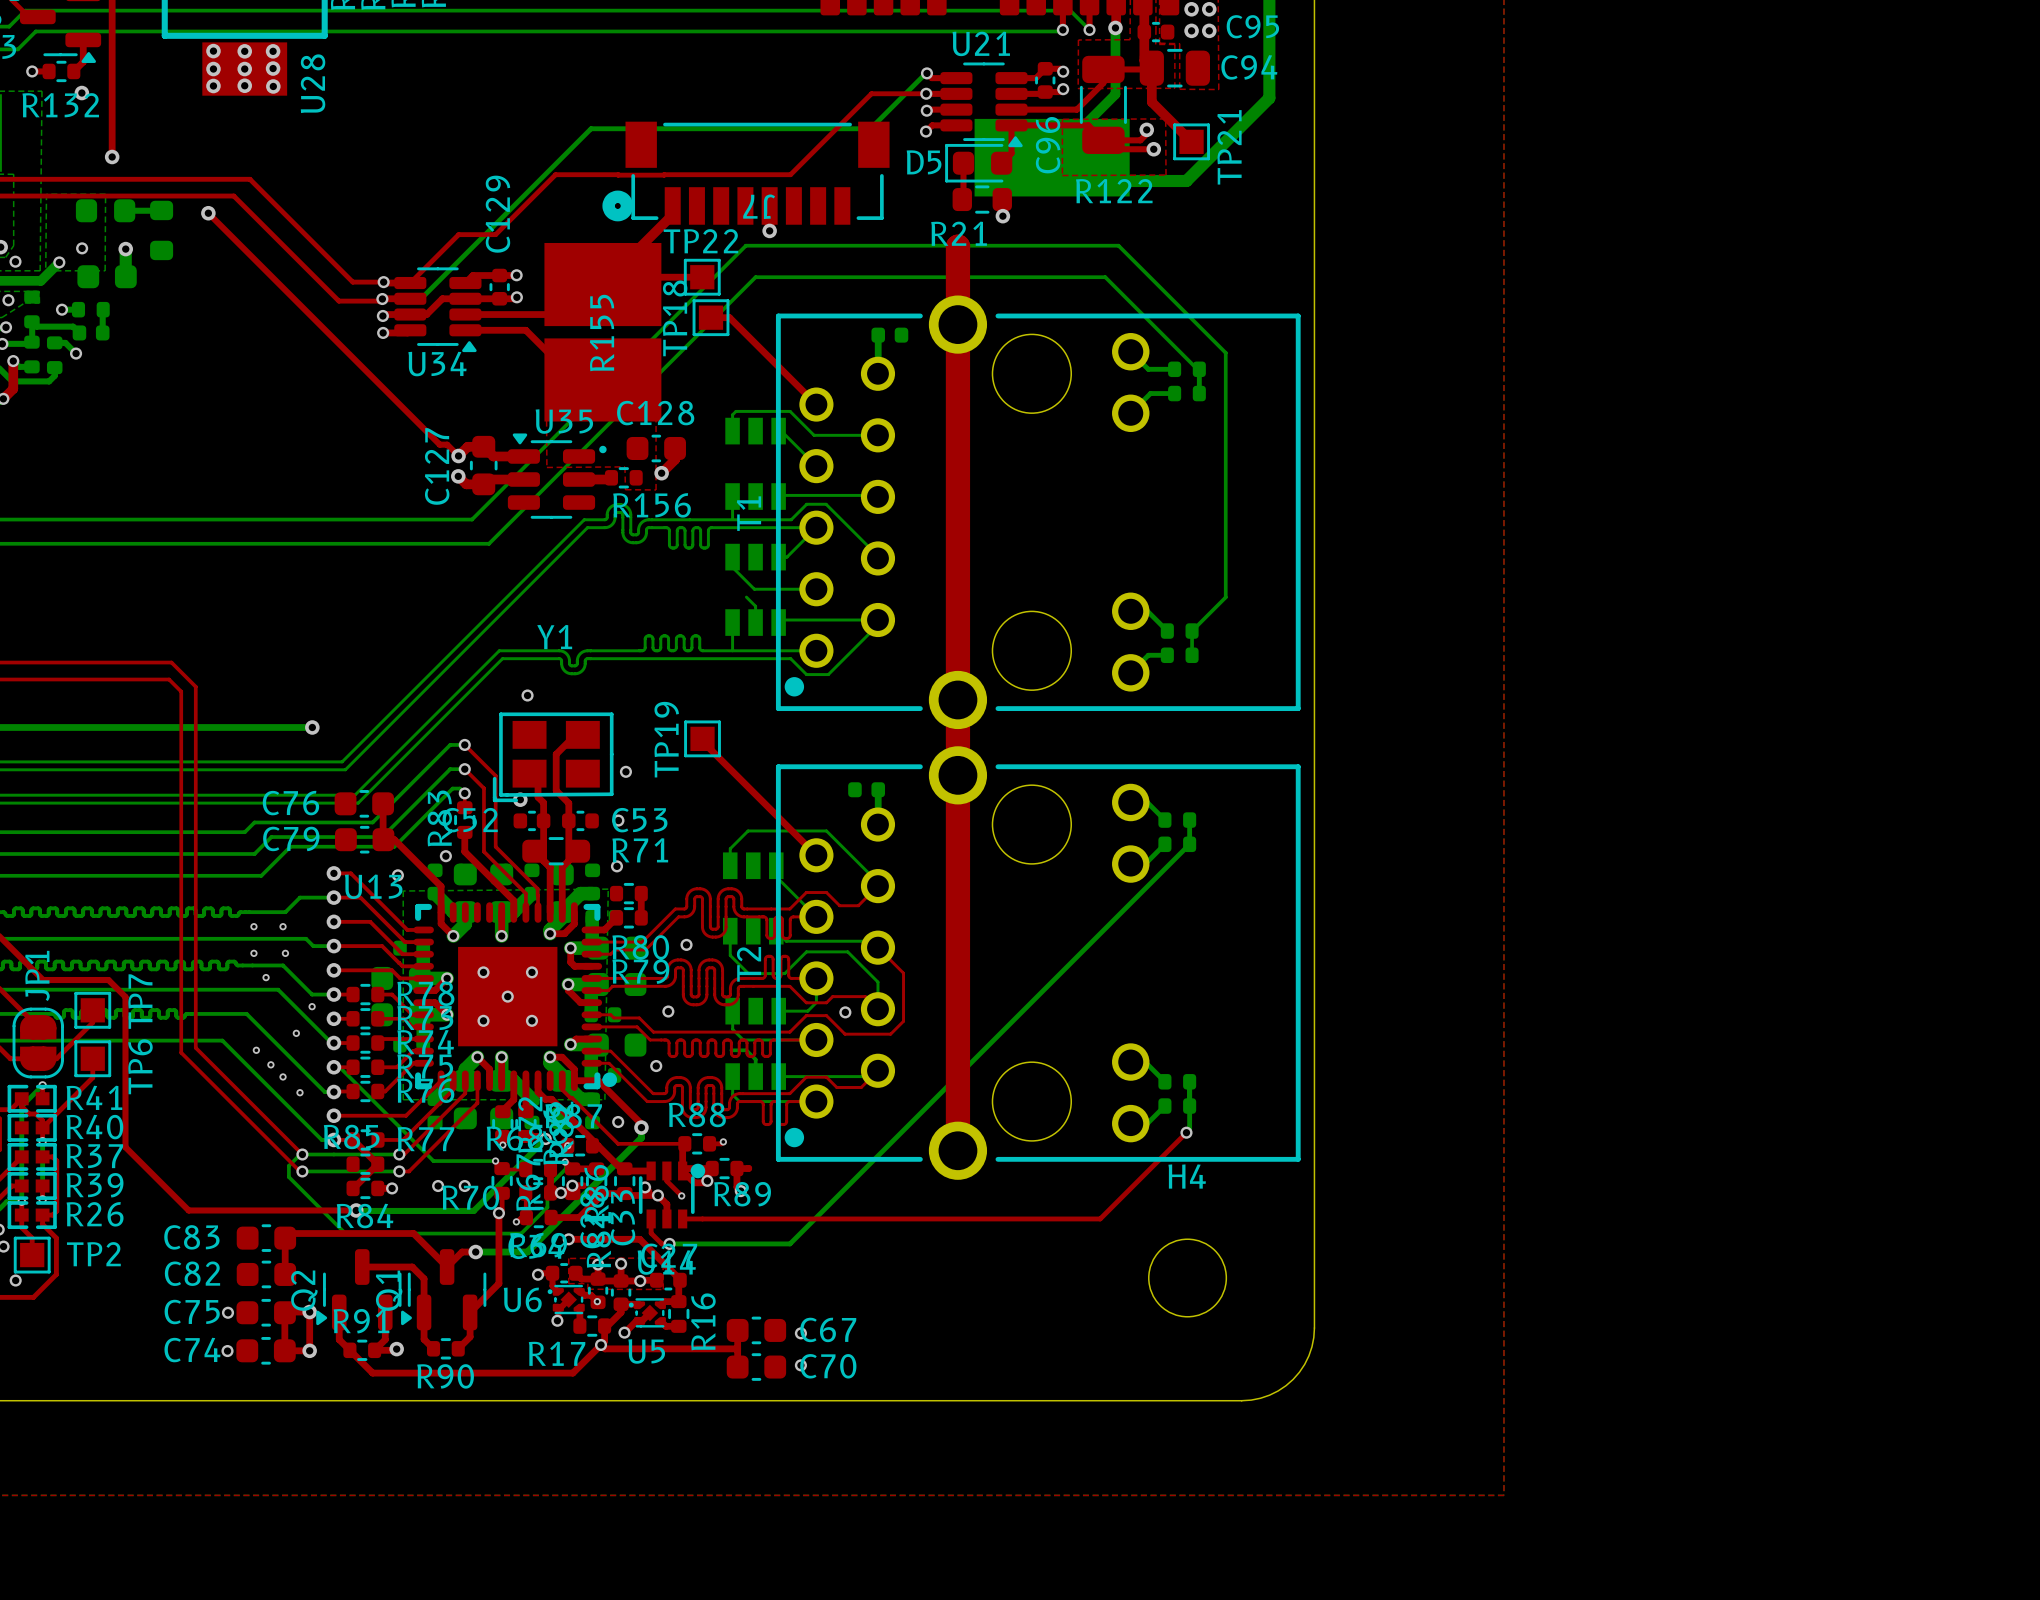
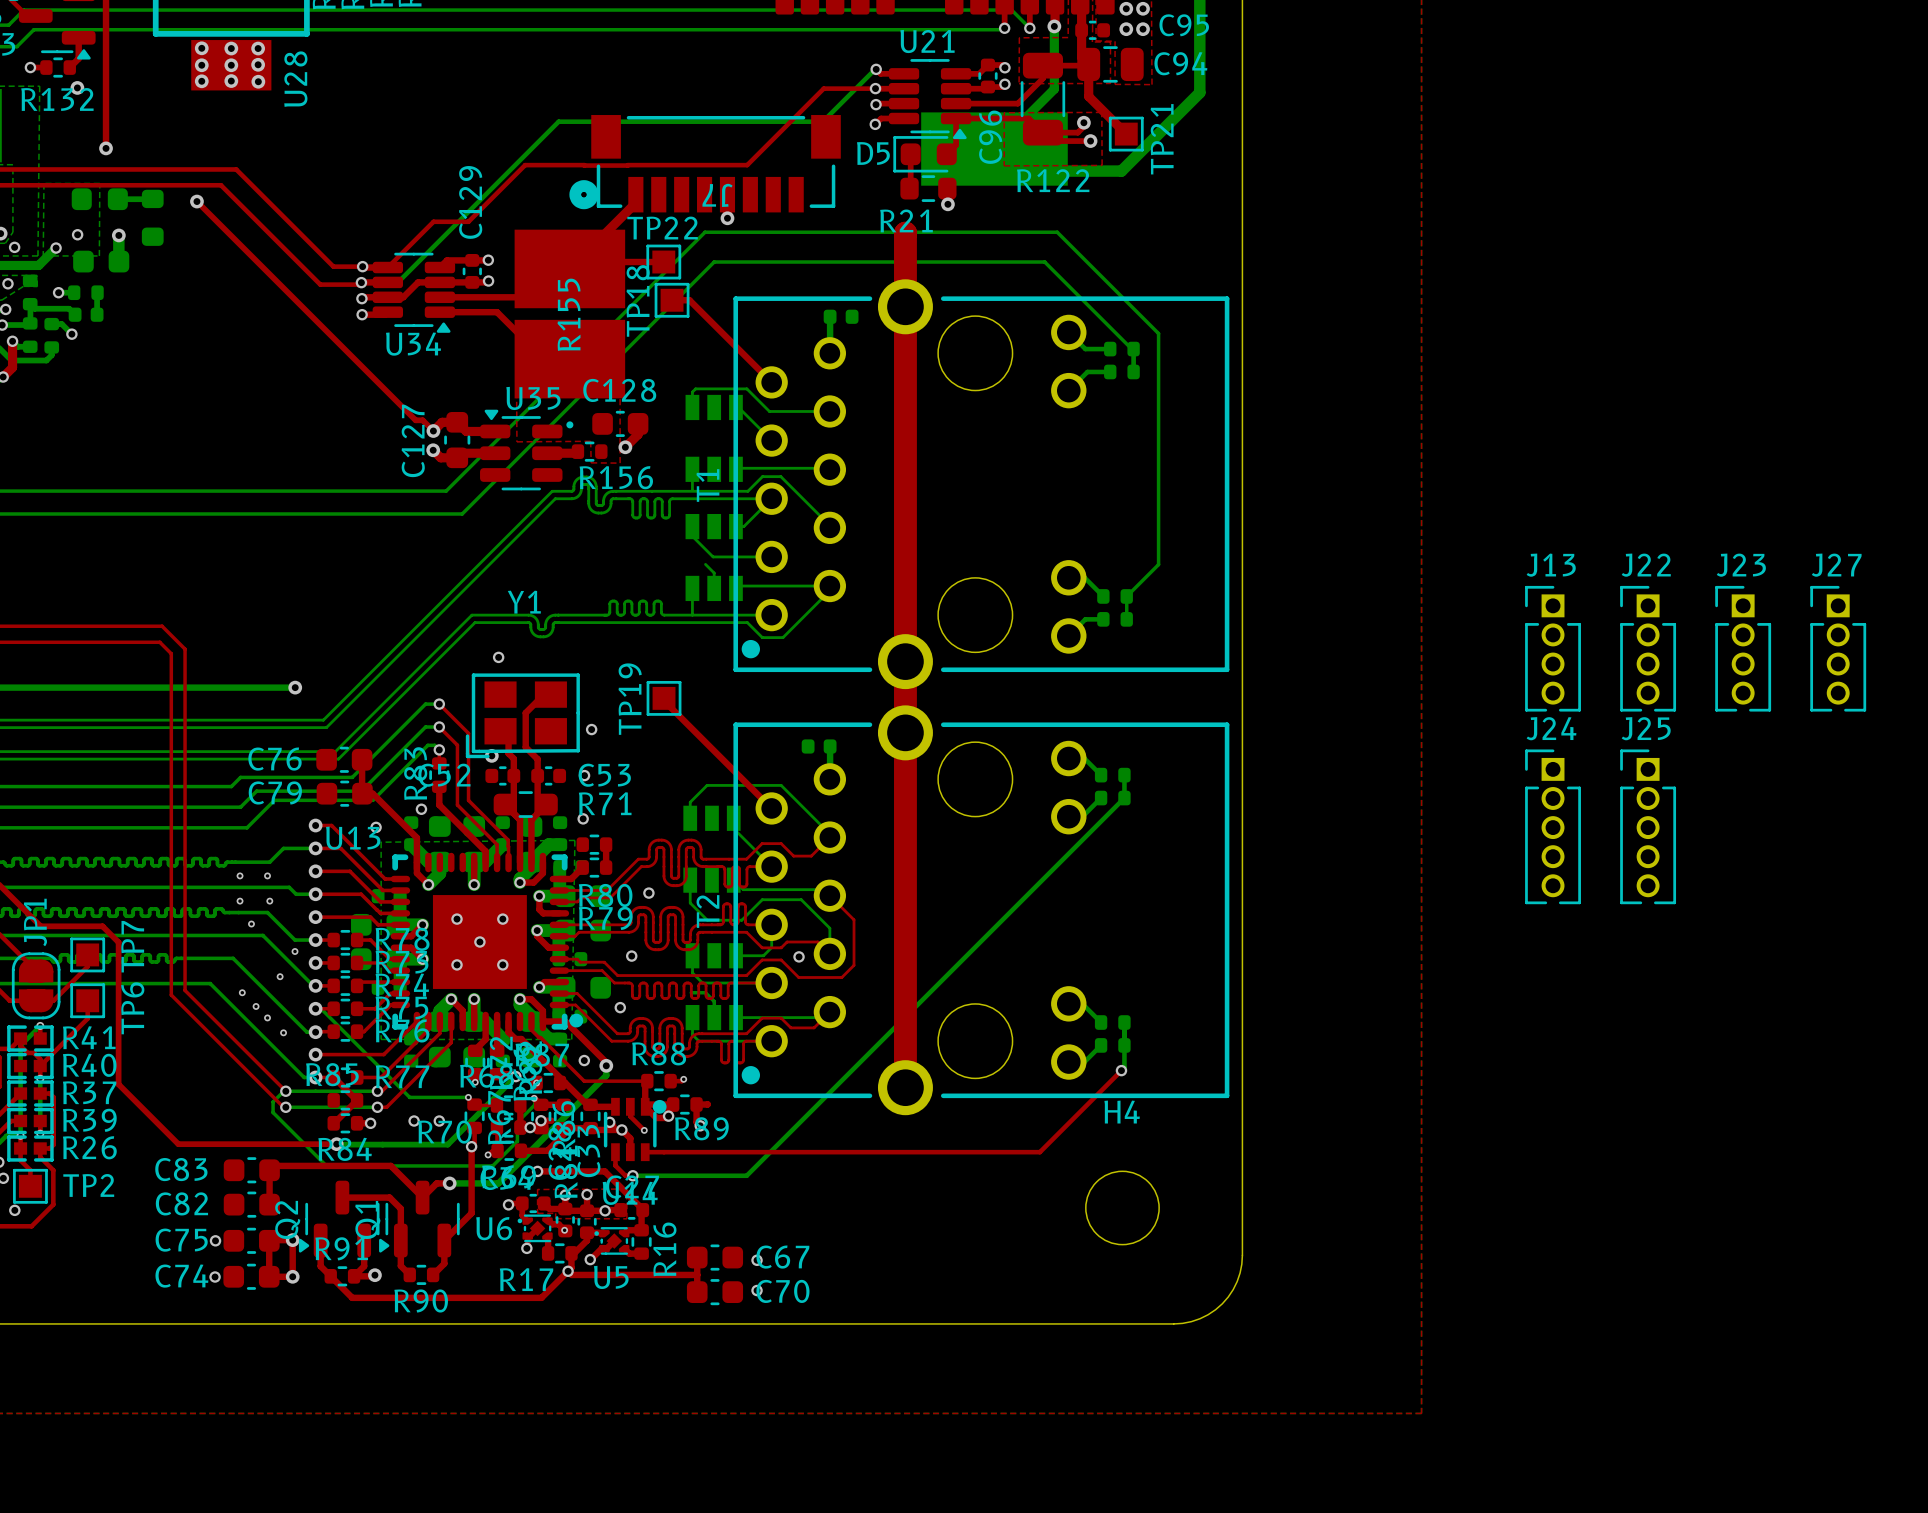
J13: none -> (1553, 648)
J22: none -> (1648, 648)
J23: none -> (1743, 648)
J27: none -> (1838, 648)
J24: none -> (1553, 826)
J25: none -> (1648, 826)

